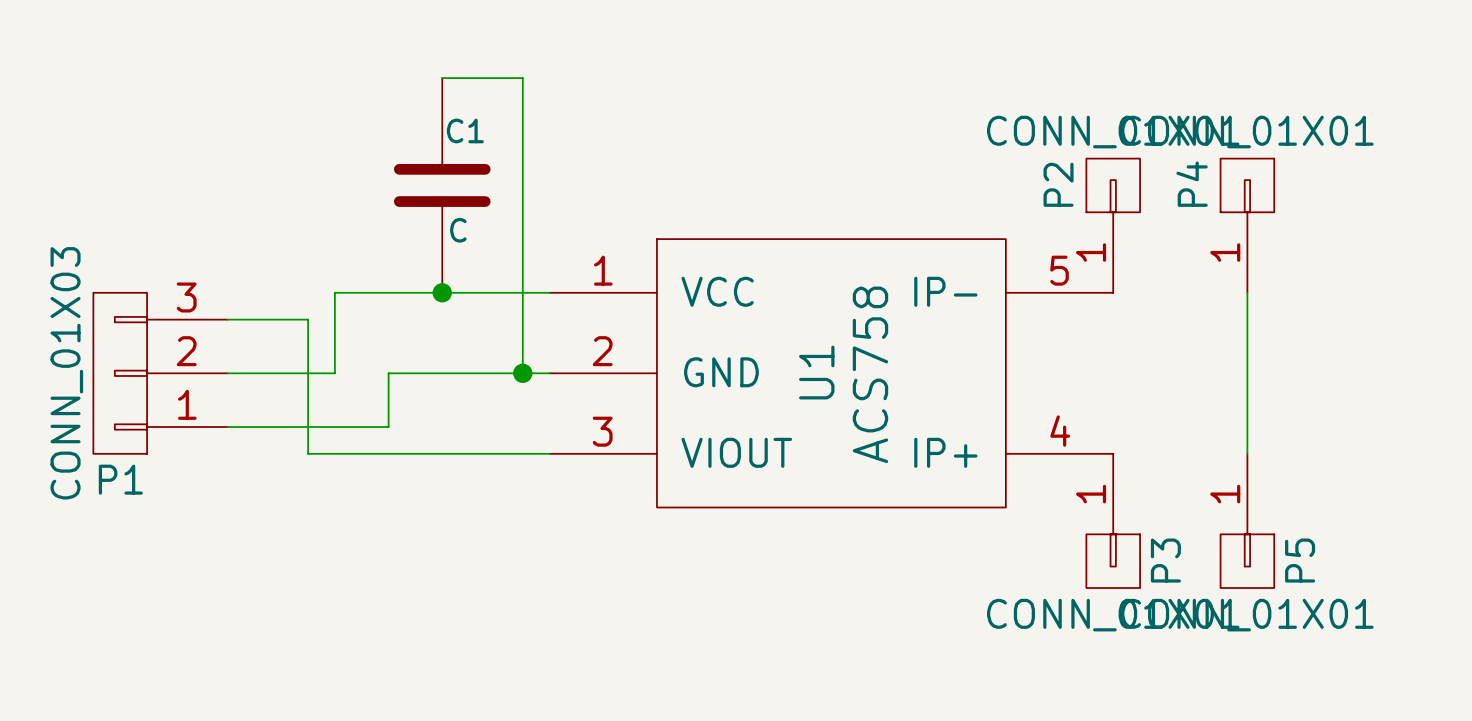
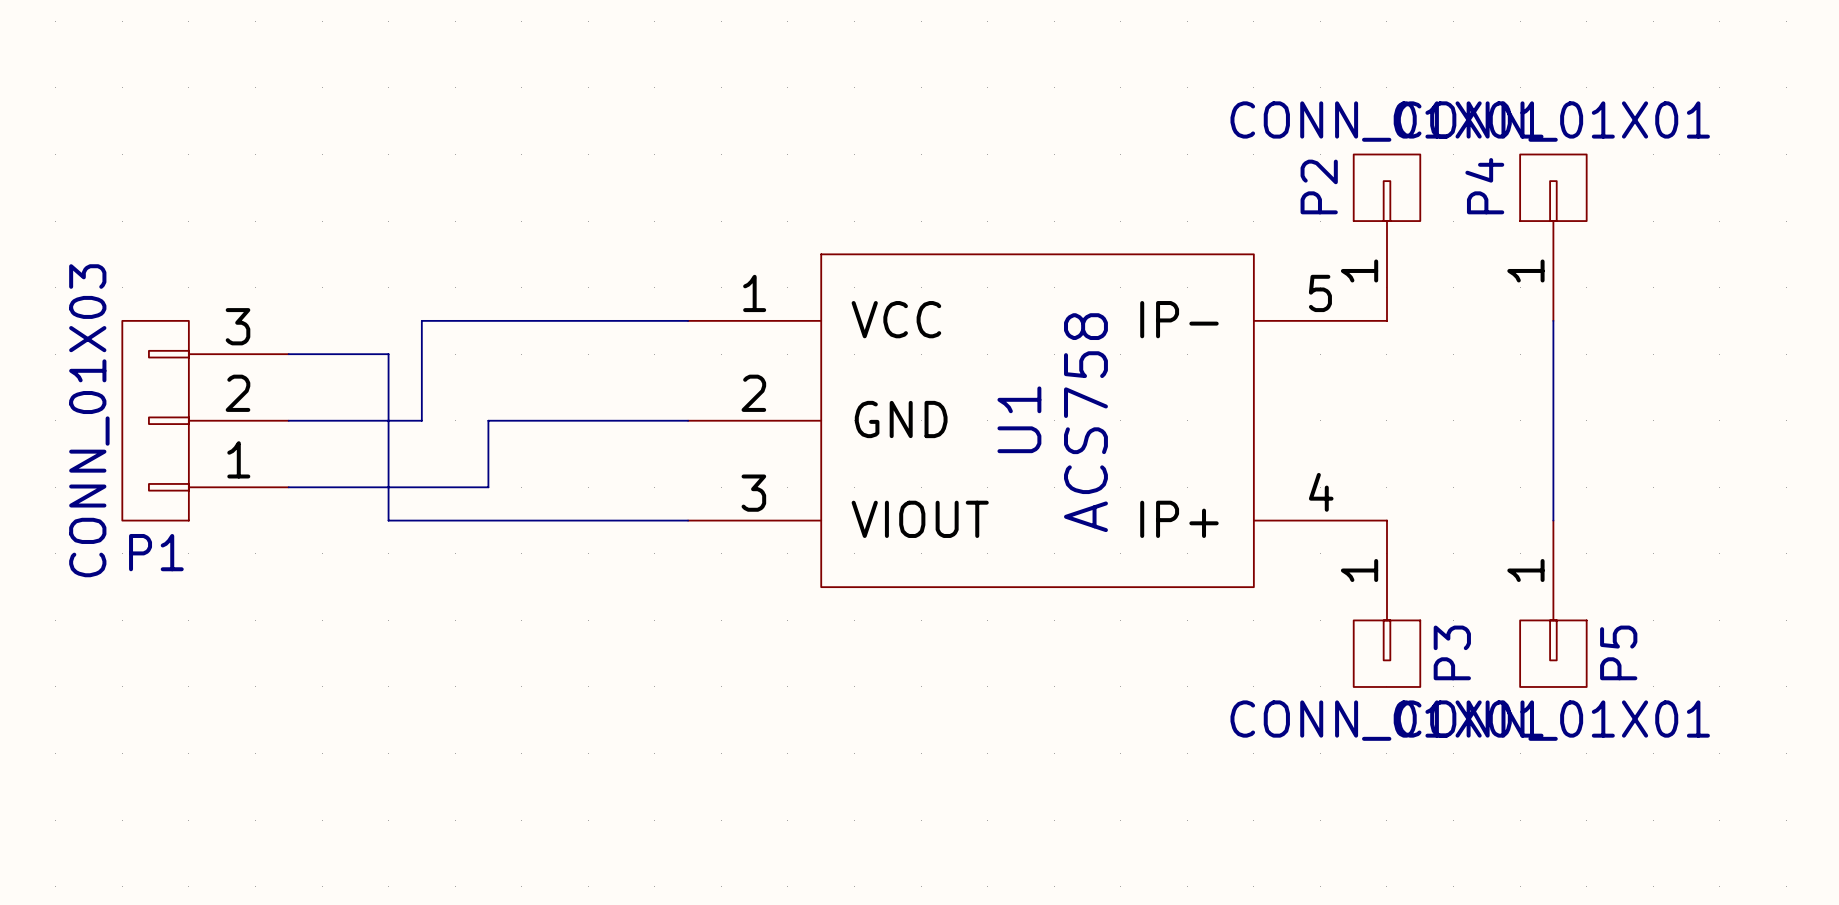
wire: (442, 78) (522, 78) (522, 373) -> none
C1: C (442, 185) -> none
junction: (442, 292) -> none
junction: (522, 373) -> none

